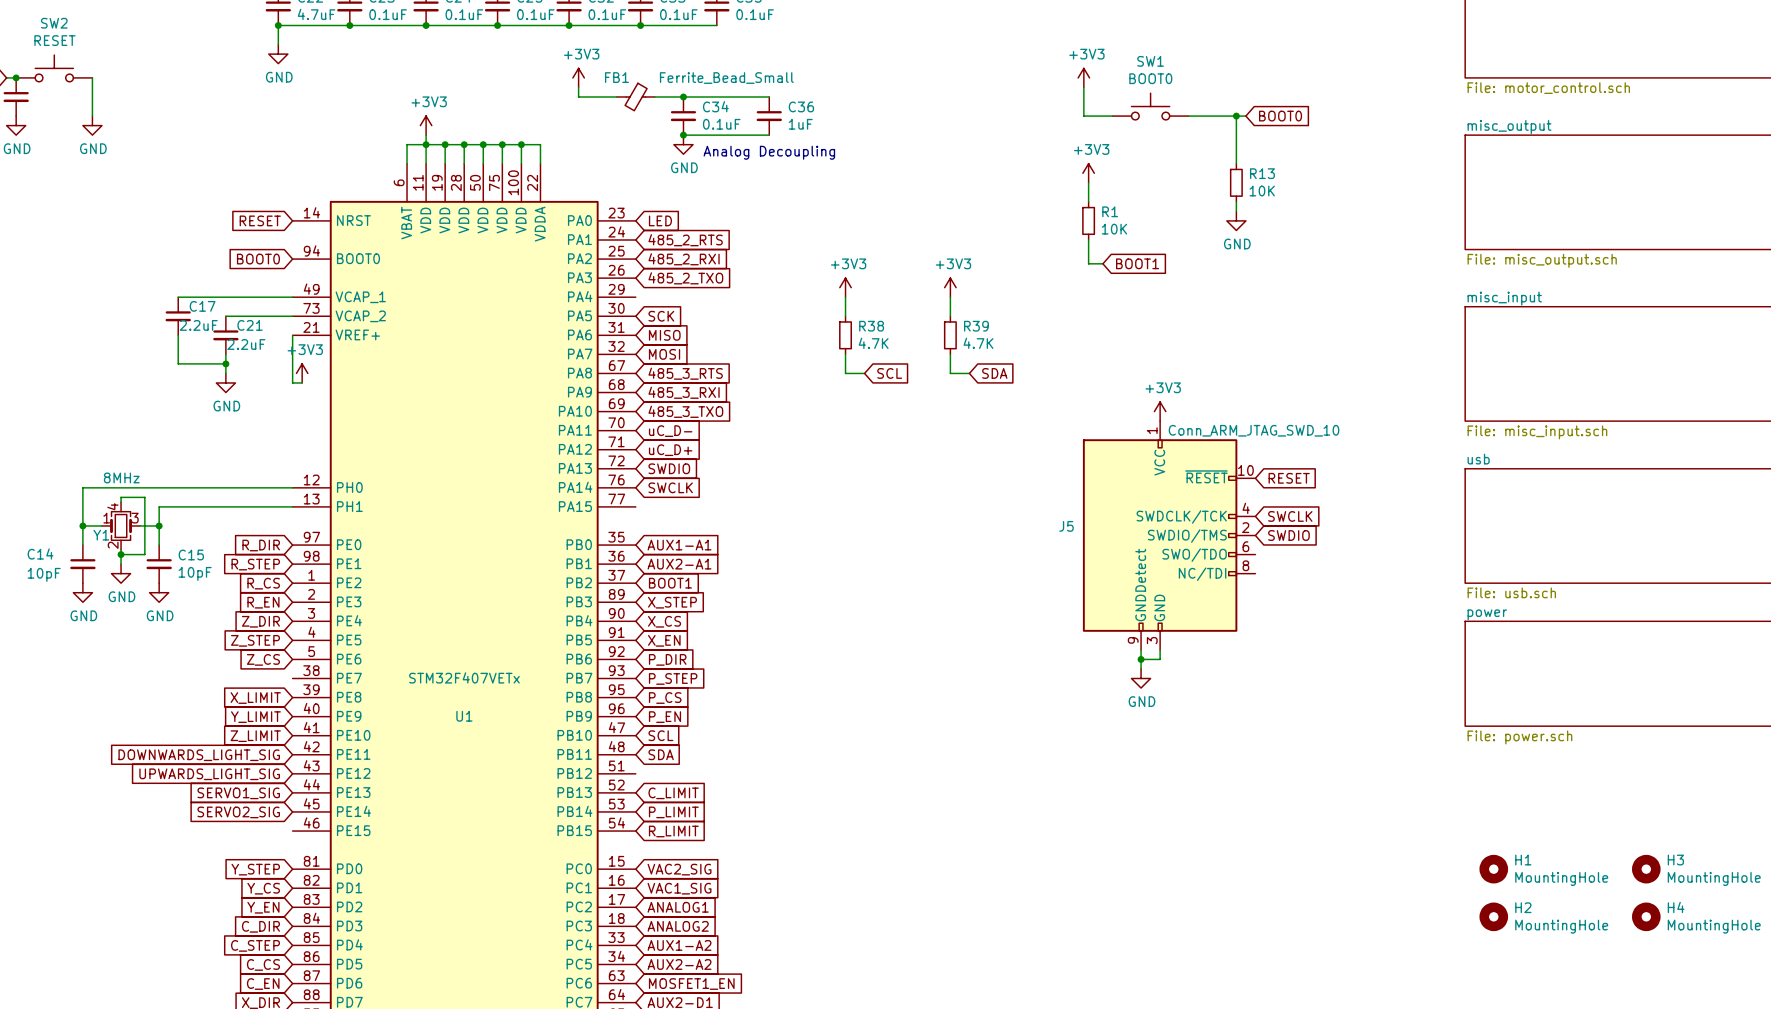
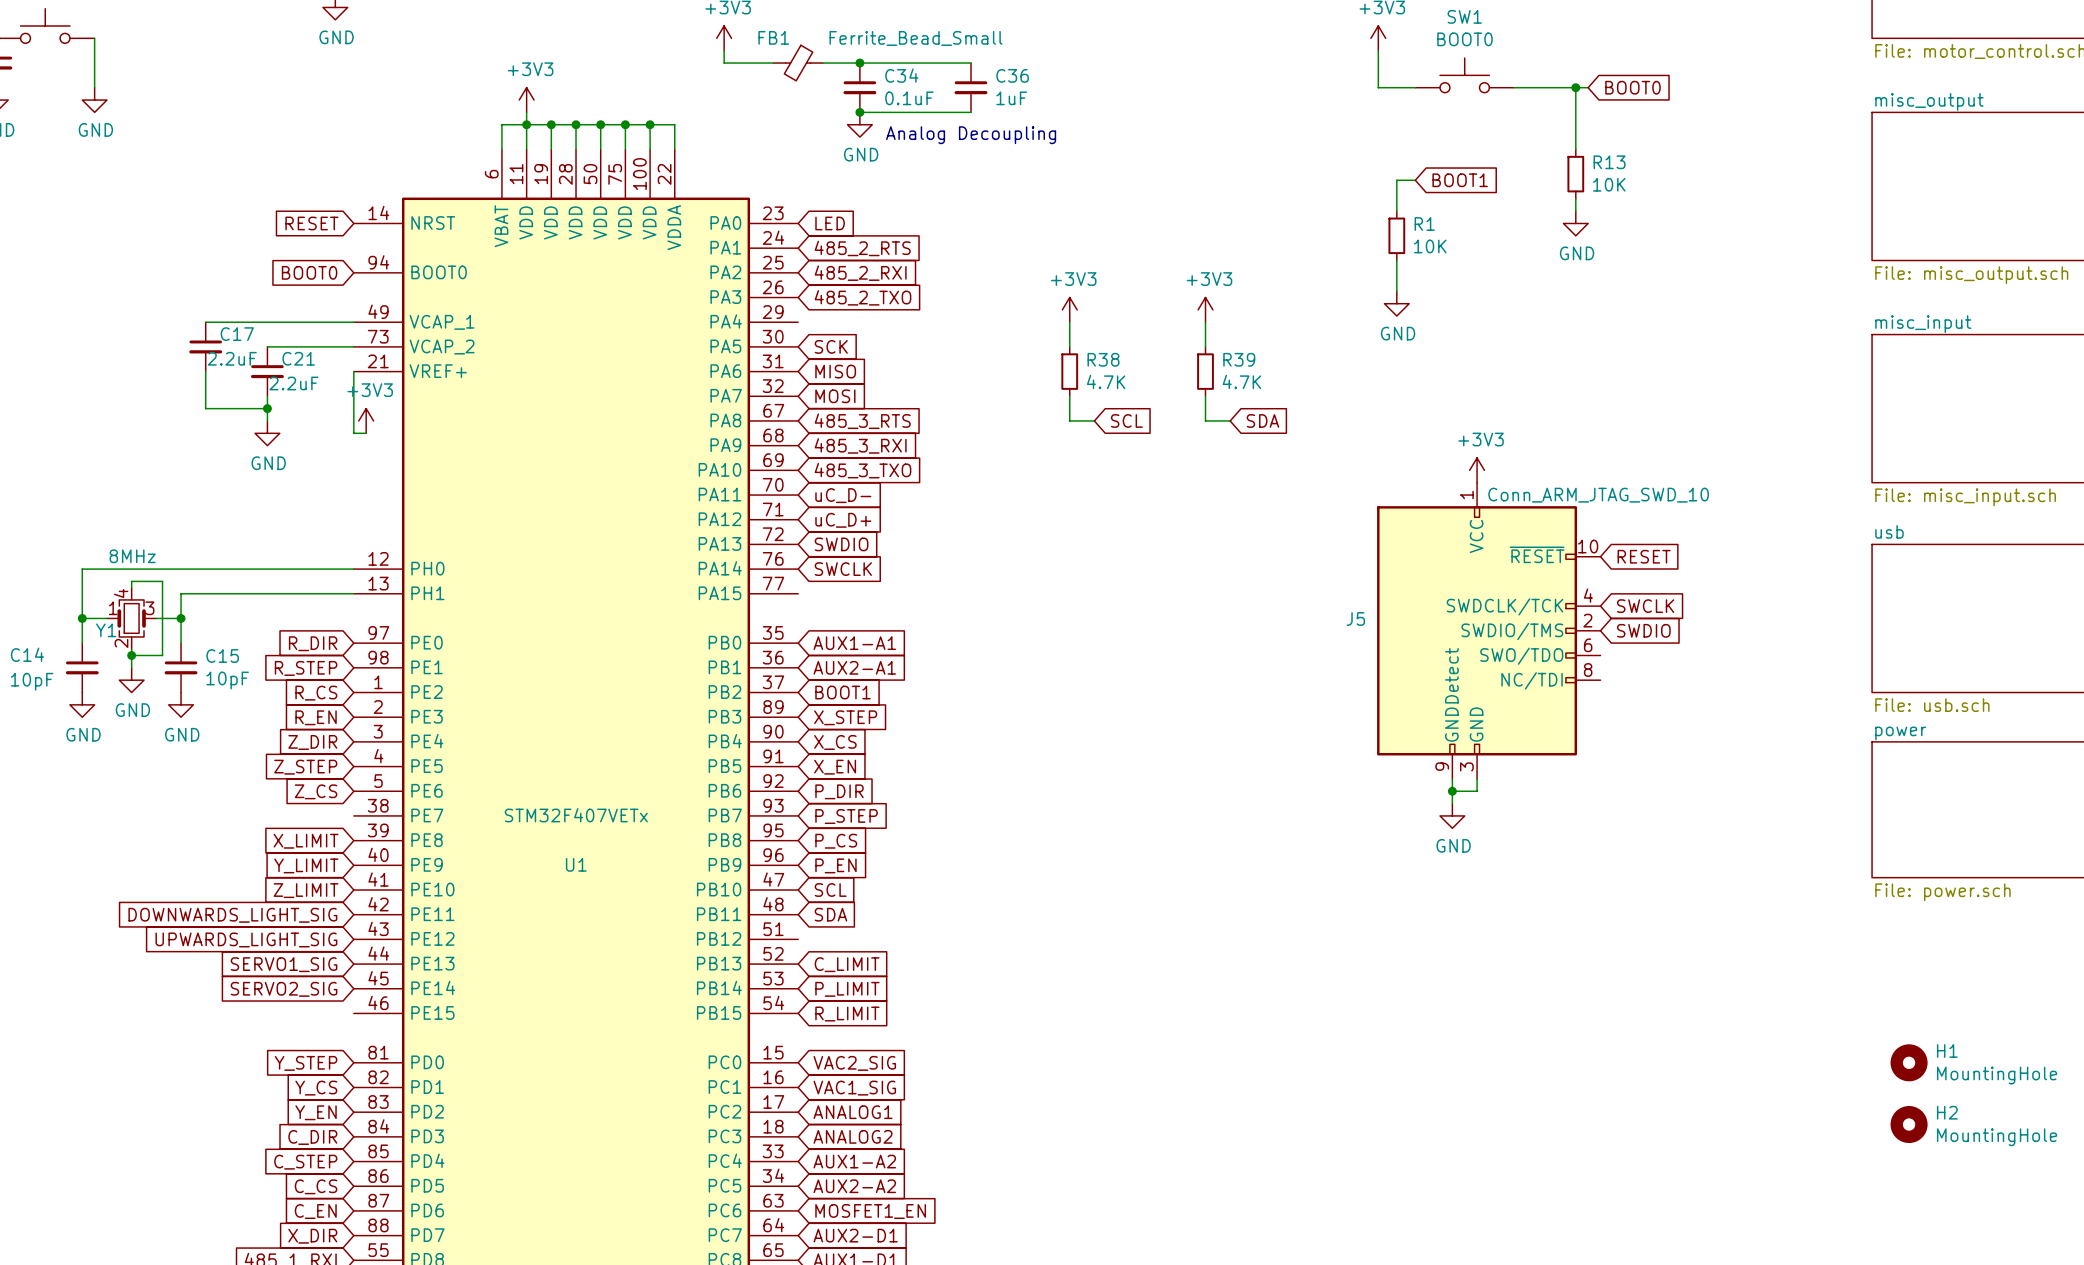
power symbol: +3V3 (1088, 173) -> none
wire: (1088, 182) (1088, 201) -> none
wire: none -> (1415, 180) (1396, 180) (1396, 211)
R1 position: (1088, 220) -> (1396, 235)
wire: (1088, 239) (1088, 263) (1102, 263) -> none
wire: none -> (1396, 260) (1396, 291)
global label position: BOOT1 (1137, 263) -> BOOT1 (1460, 180)
power symbol: none -> GND (1396, 303)

